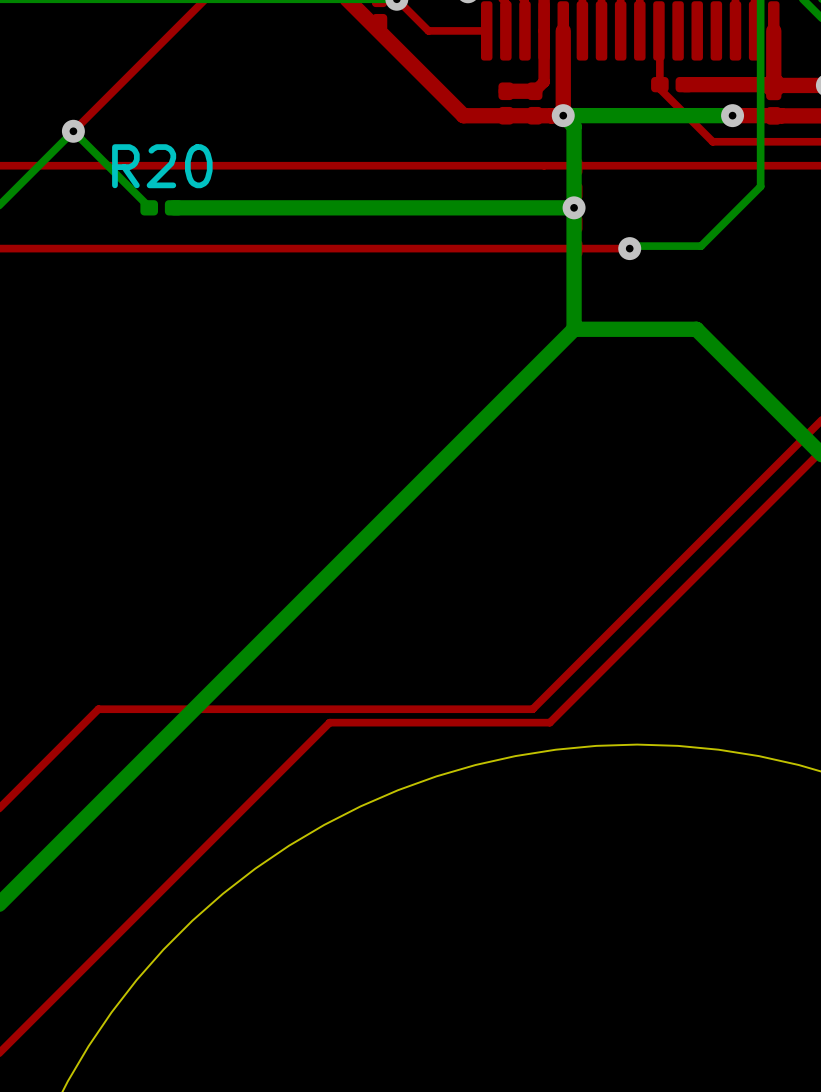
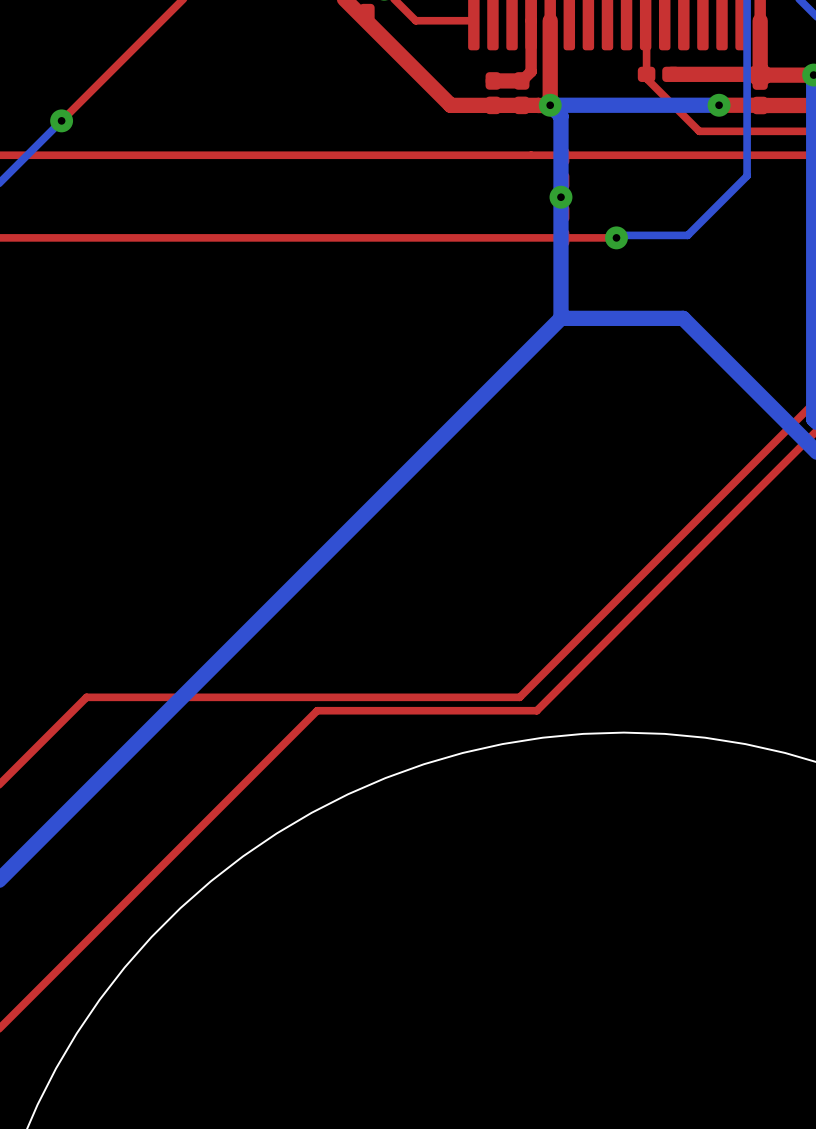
bottom track: (73, 131) (147, 204) -> none
R20: (161, 207) -> none
bottom track: (574, 207) (173, 207) -> none

